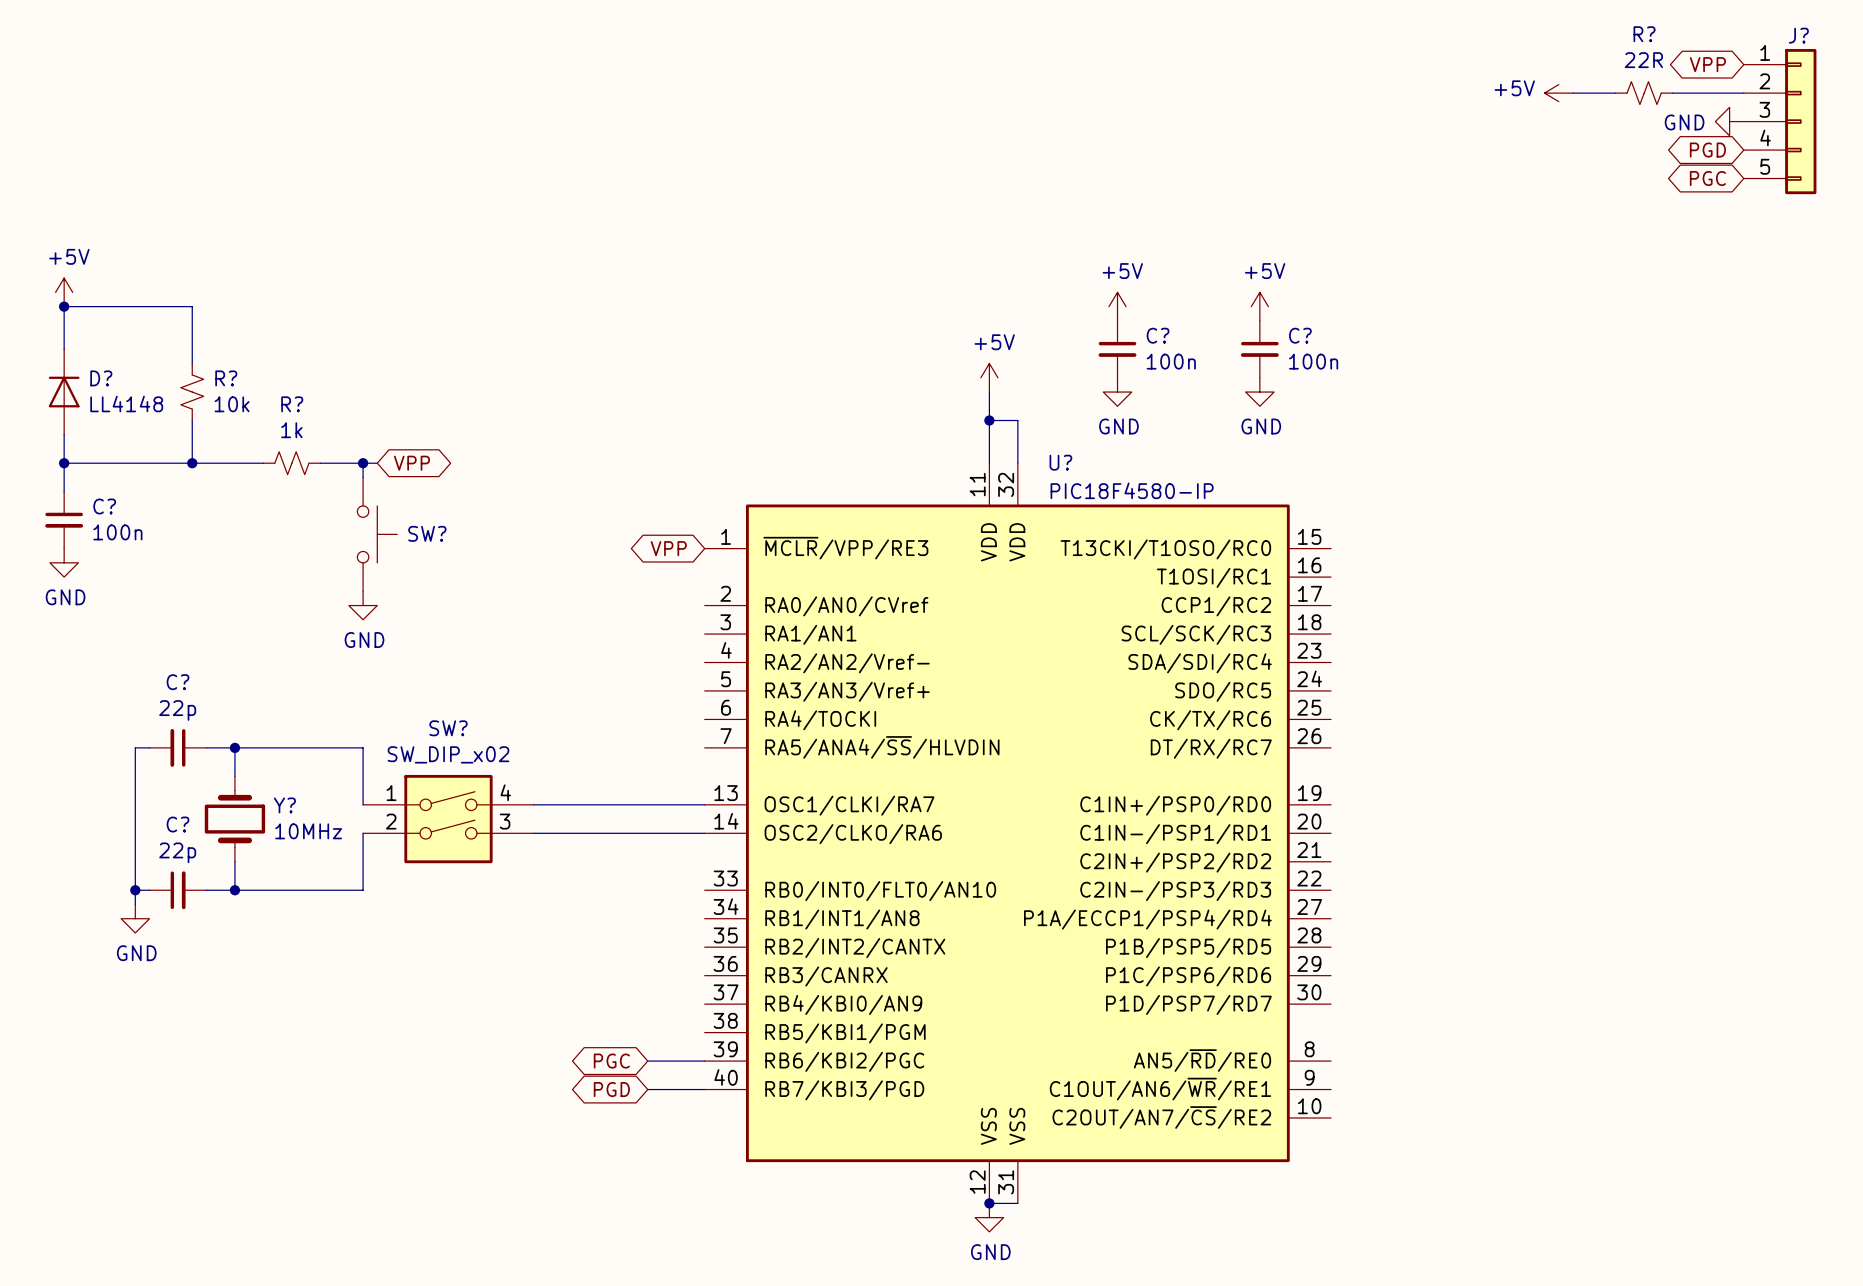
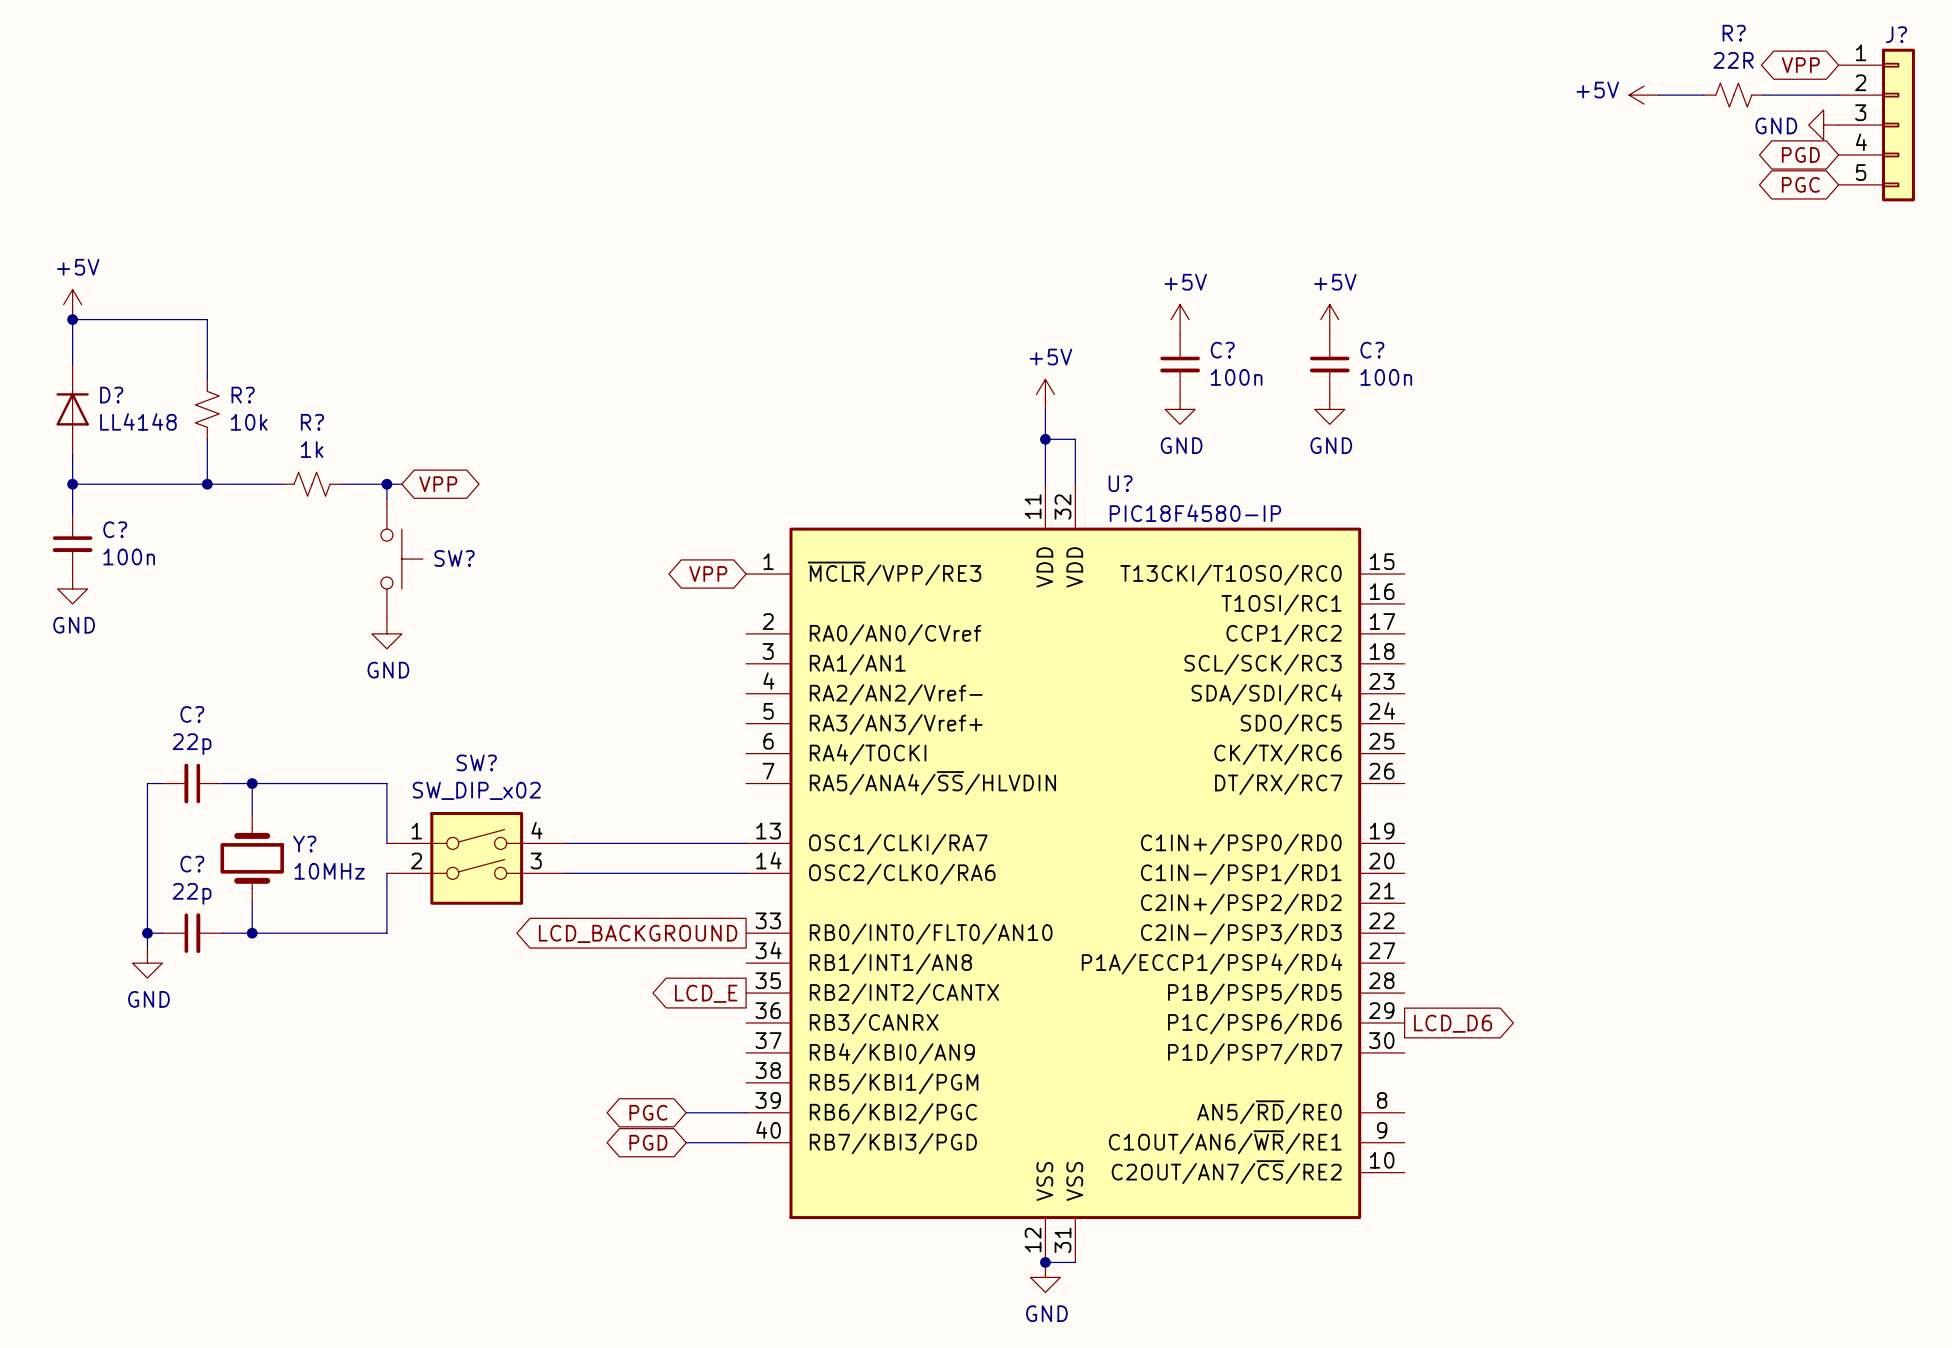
global label: none -> LCD_BACKGROUND (638, 933)
global label: none -> LCD_E (706, 993)
global label: none -> LCD_D6 (1453, 1023)

